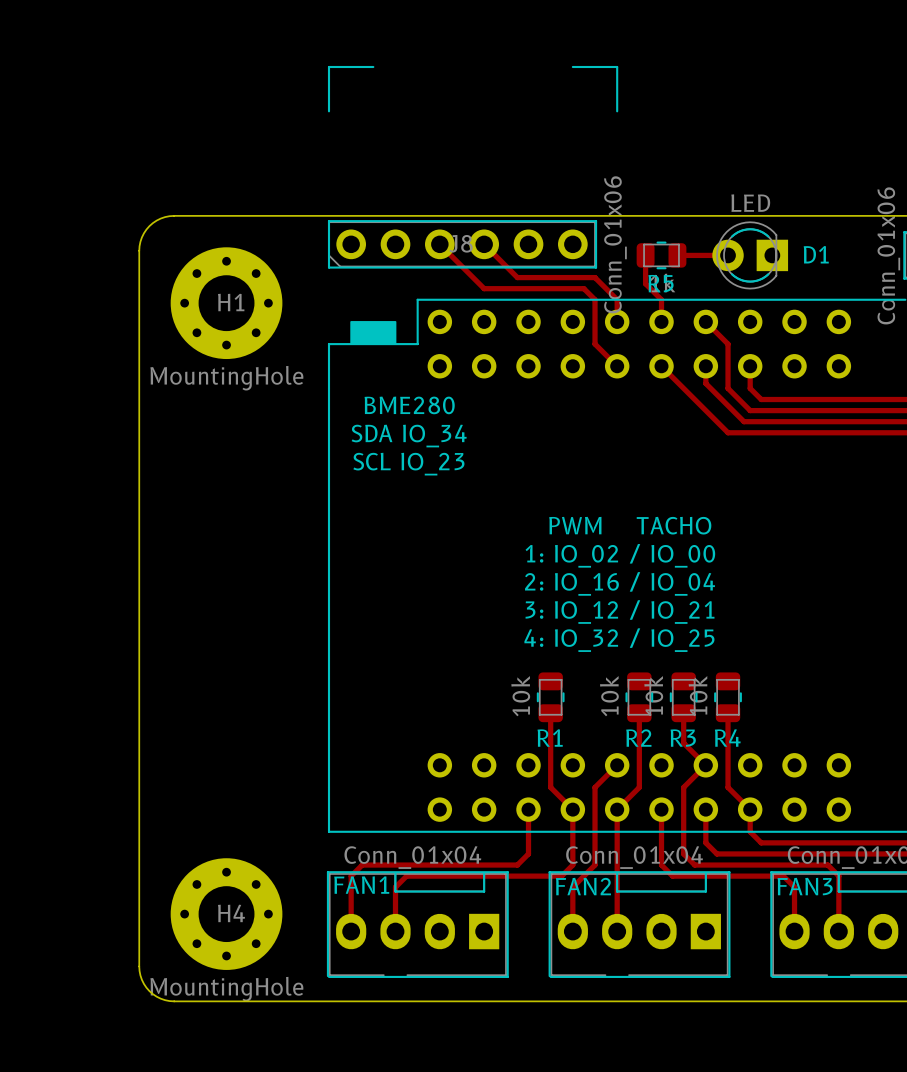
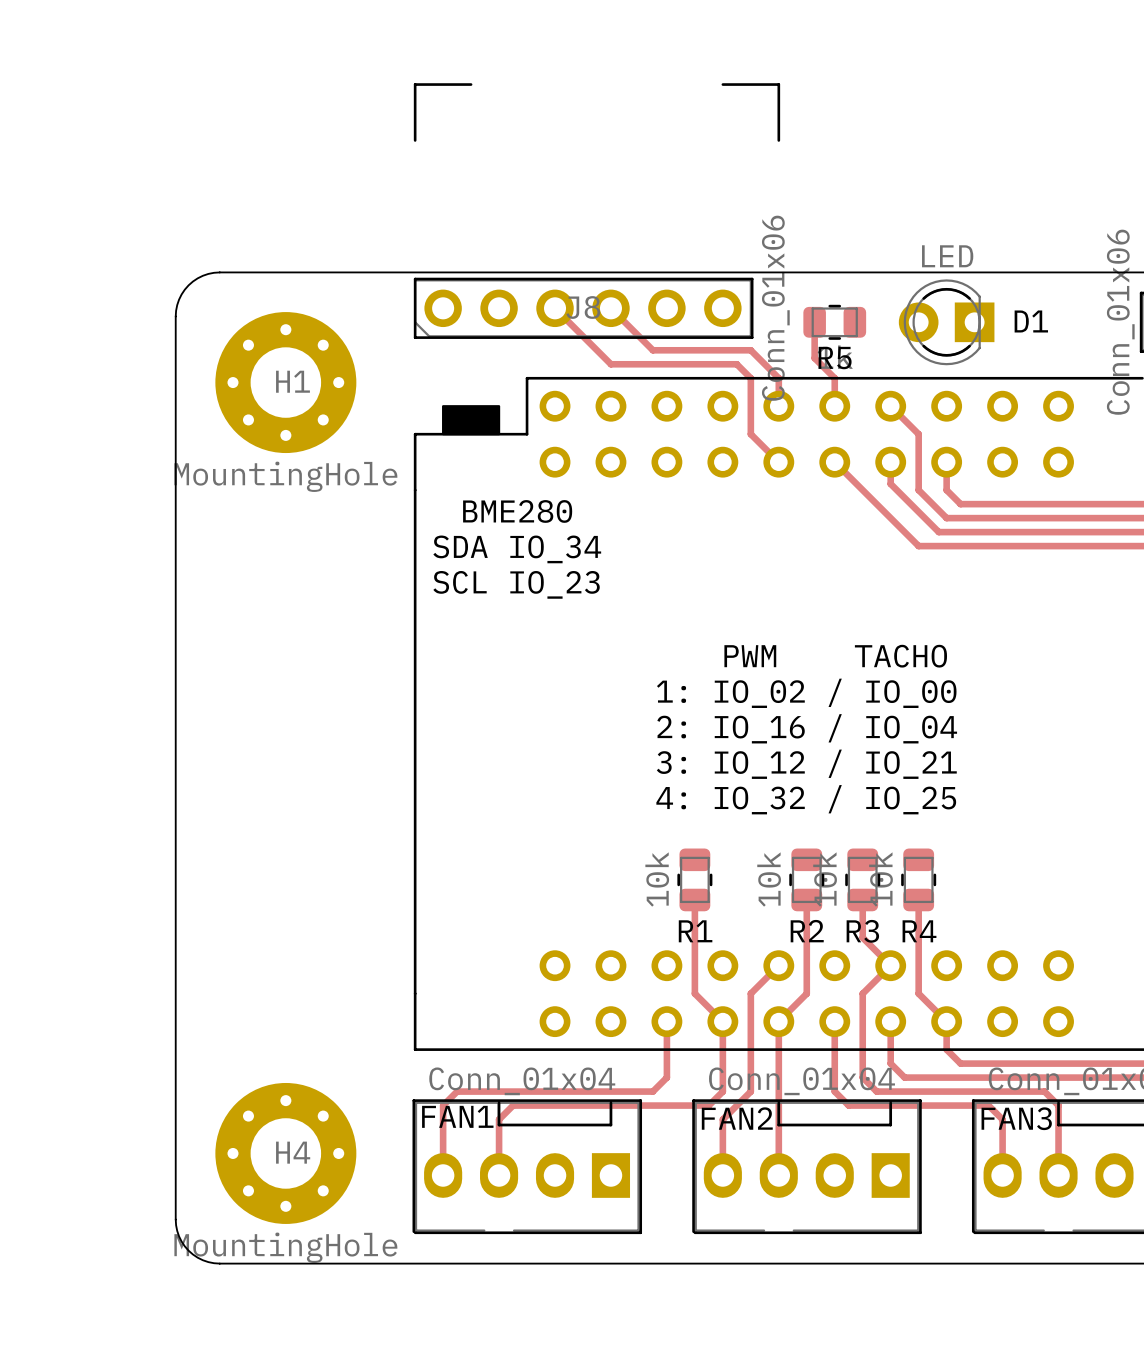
track: (677, 255) (728, 255) -> none
text position: PWM TACHO (630, 525) -> PWM TACHO (835, 656)
text position: 1: IO_02 / IO_00 (620, 555) -> 1: IO_02 / IO_00 (806, 693)
text position: 2: IO_16 / IO_04 (620, 583) -> 2: IO_16 / IO_04 (807, 728)
text position: 3: IO_12 / IO_21 (620, 612) -> 3: IO_12 / IO_21 (806, 764)
text position: 4: IO_32 / IO_25 (619, 640) -> 4: IO_32 / IO_25 (806, 799)

